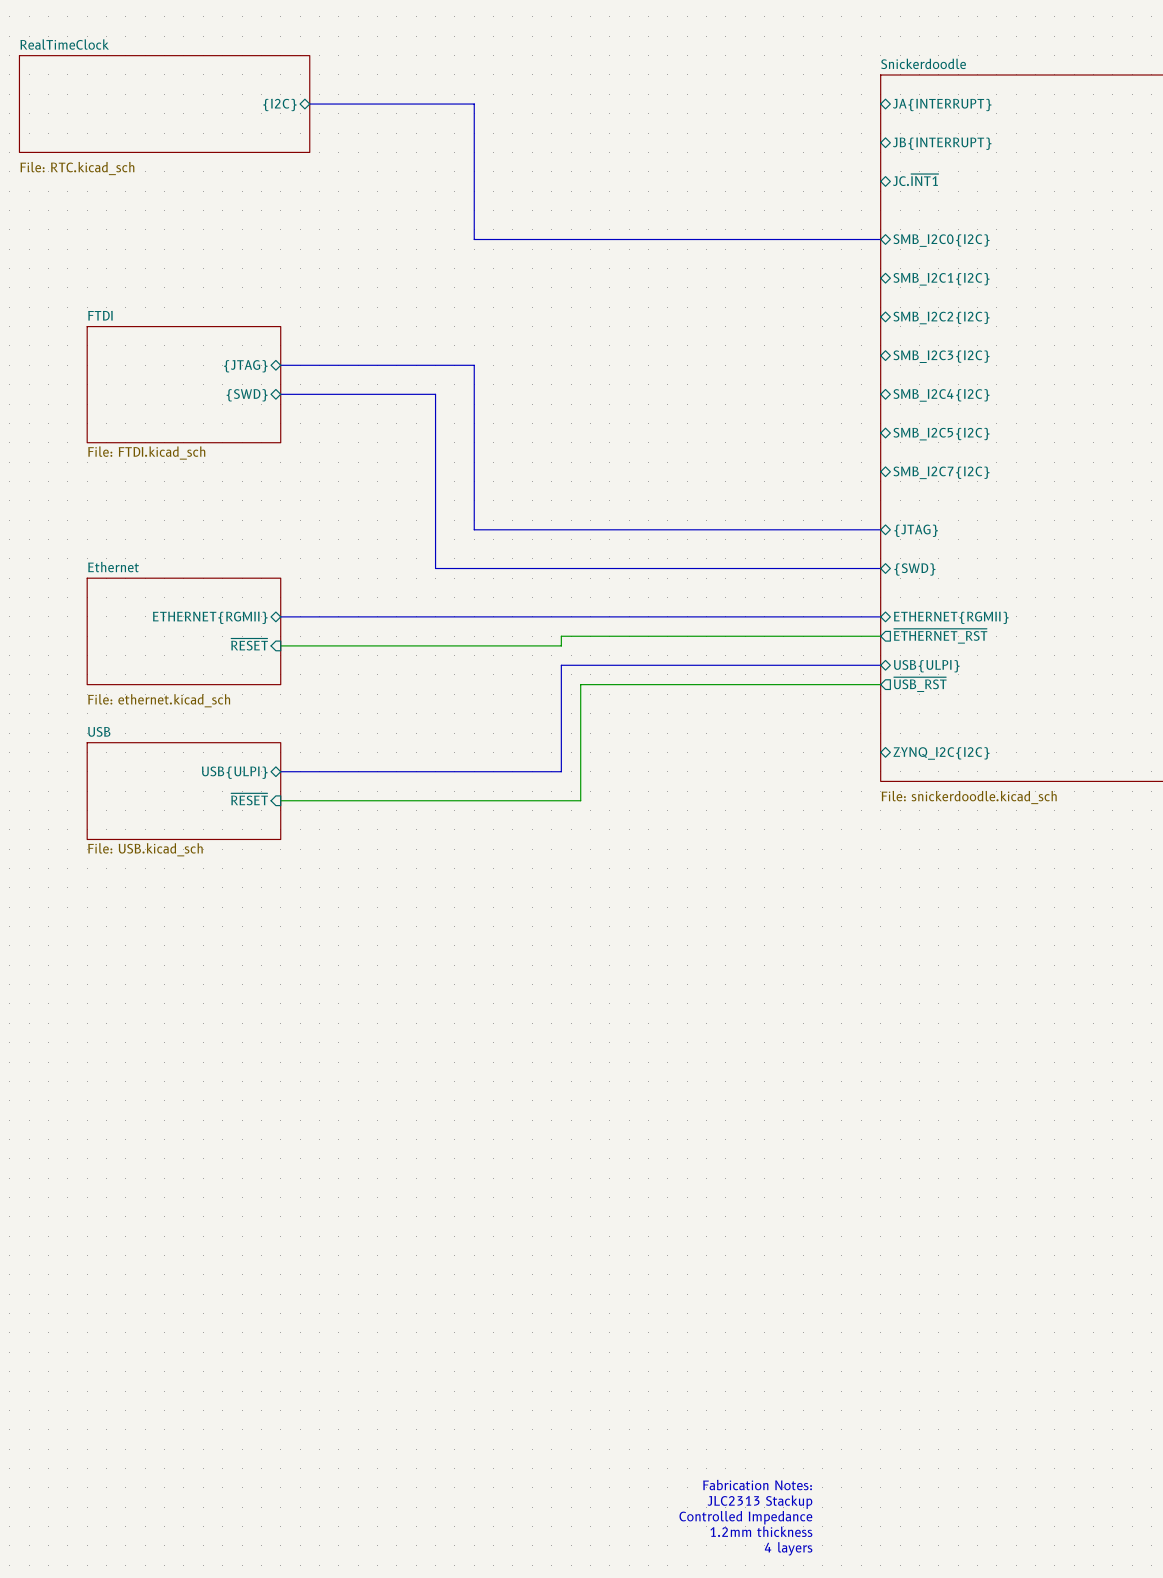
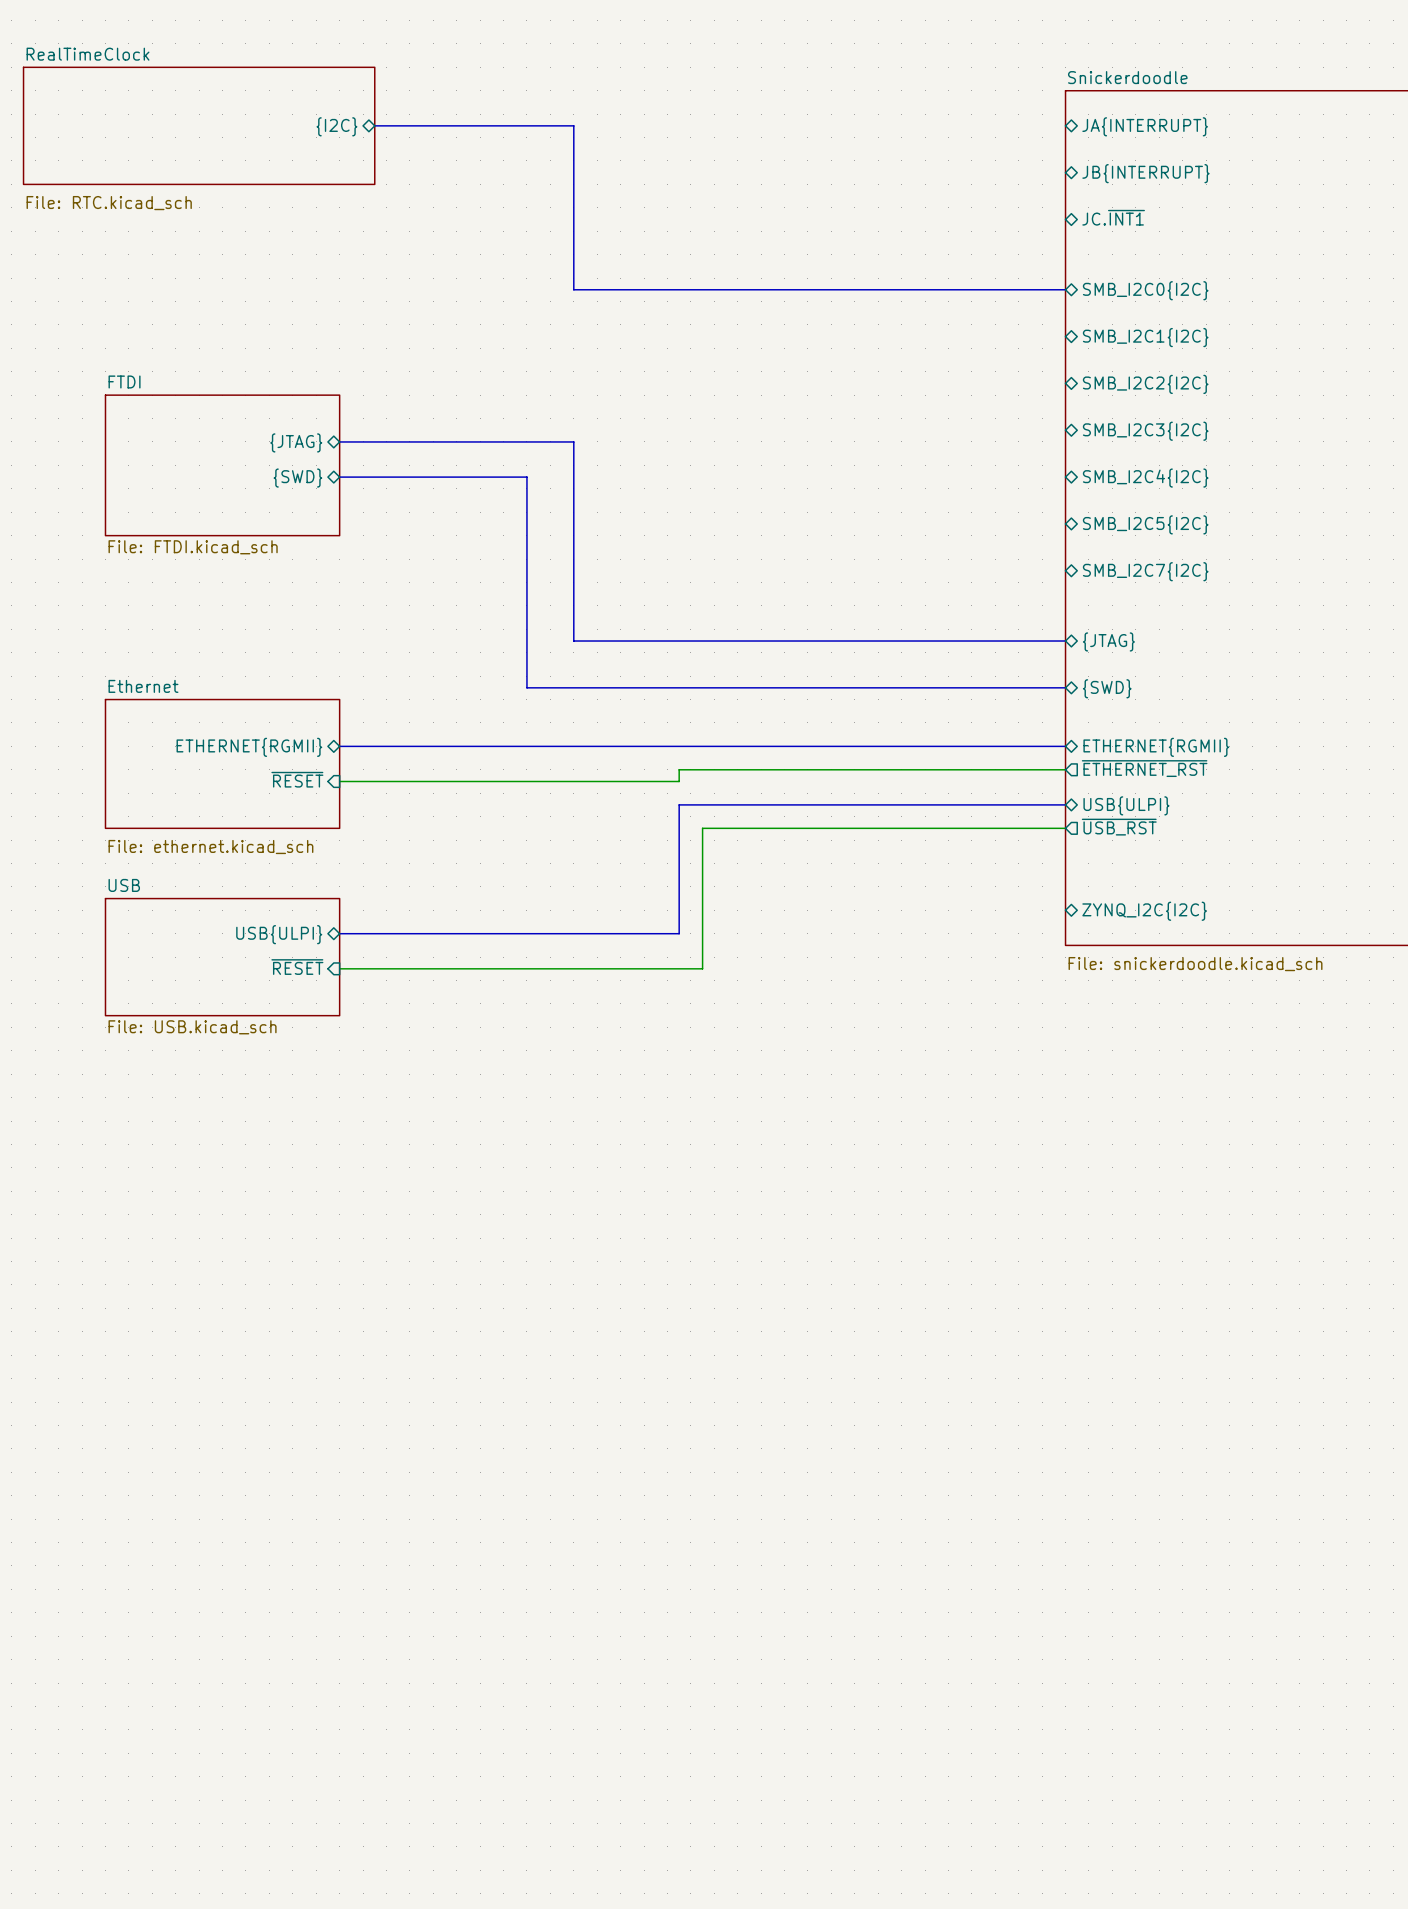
text: Fabrication Notes: (757, 1485) -> none
text: JLC2313 Stackup (759, 1502) -> none
text: Controlled Impedance (745, 1517) -> none
text: 1.2mm thickness (761, 1531) -> none
text: 4 layers (788, 1548) -> none

